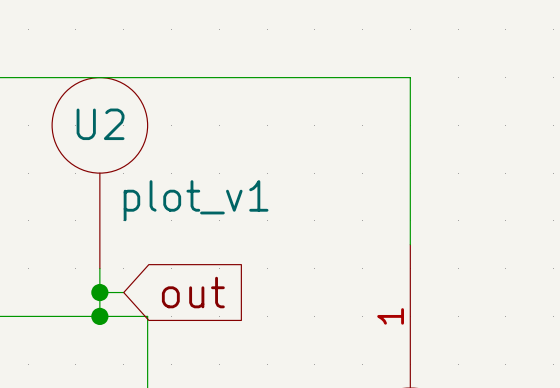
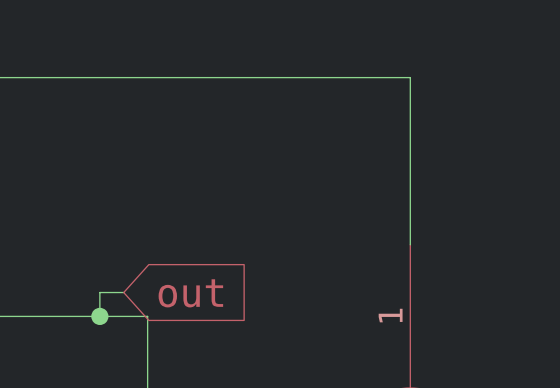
U2: plot_v1 (99, 173) -> none
wire: (99, 268) (99, 292) -> none
junction: (99, 292) -> none

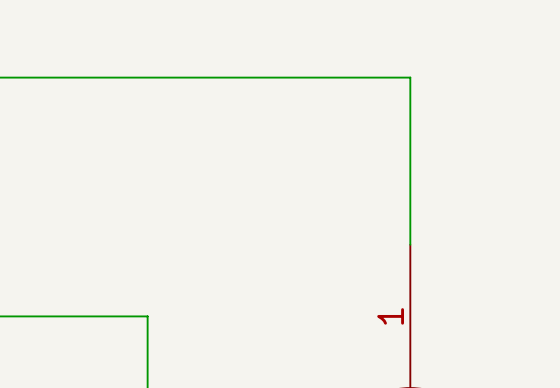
wire: (123, 292) (99, 292) (99, 316) -> none
global label: out (190, 293) -> none
junction: (99, 316) -> none

